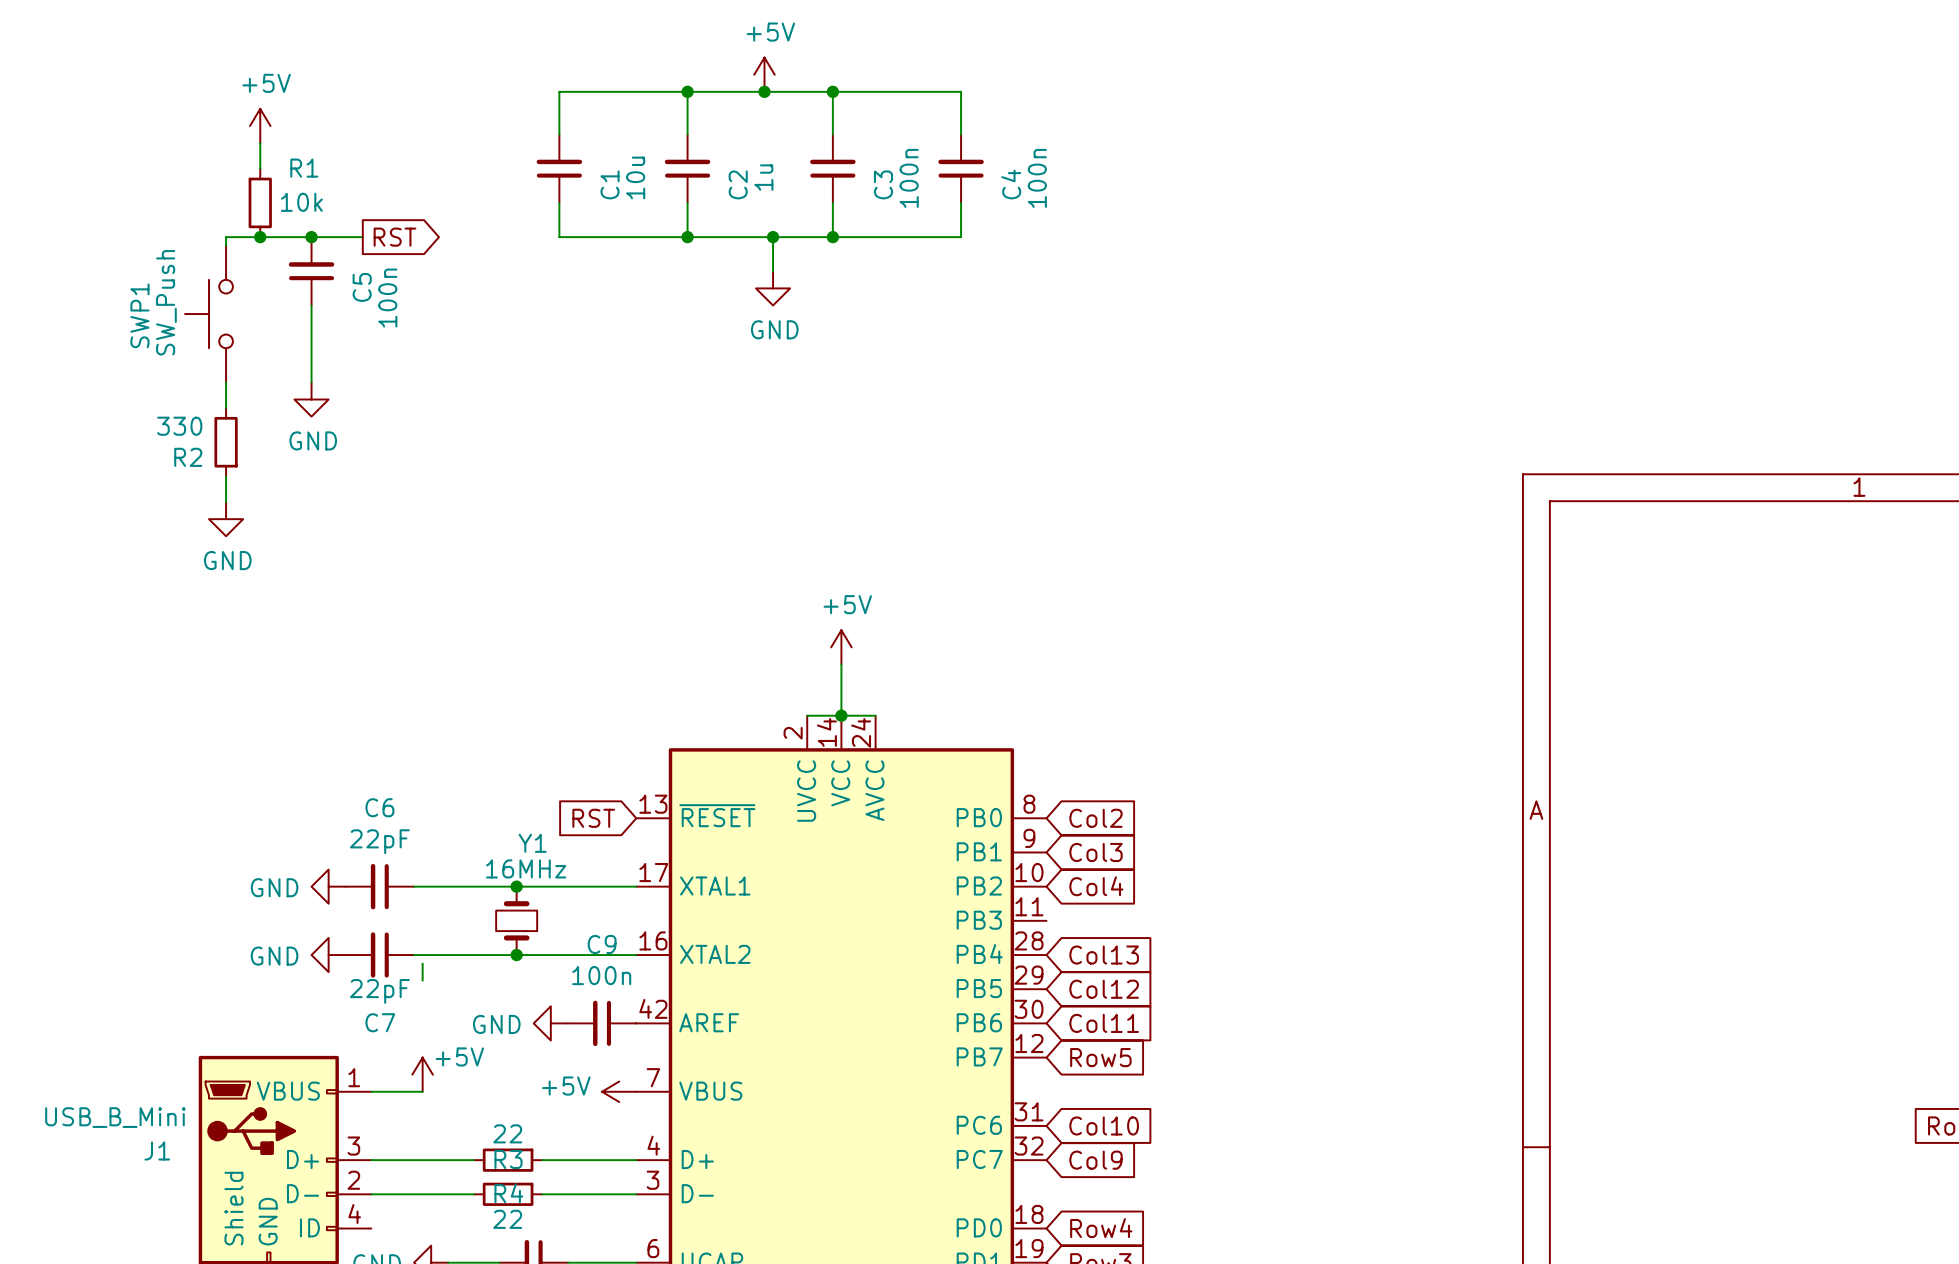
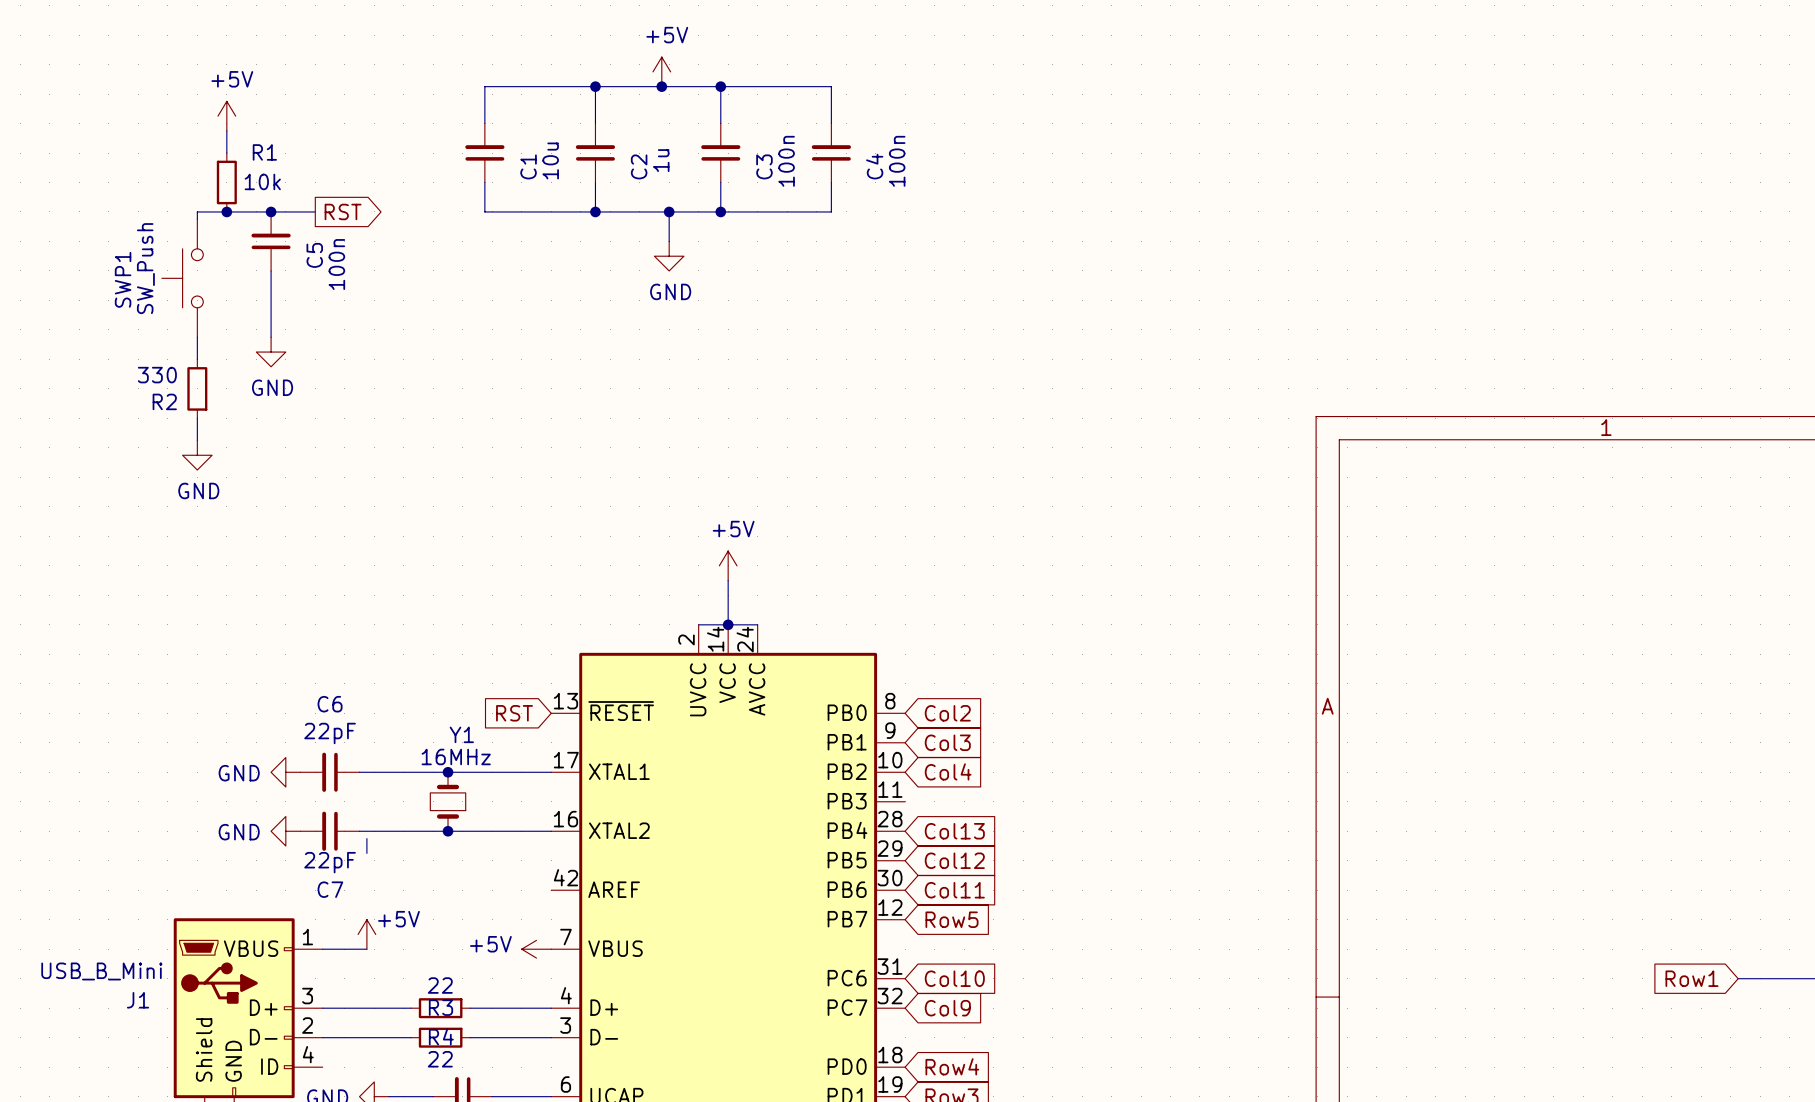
power symbol: GND (550, 1023) -> none
C9: 100n (602, 1023) -> none

